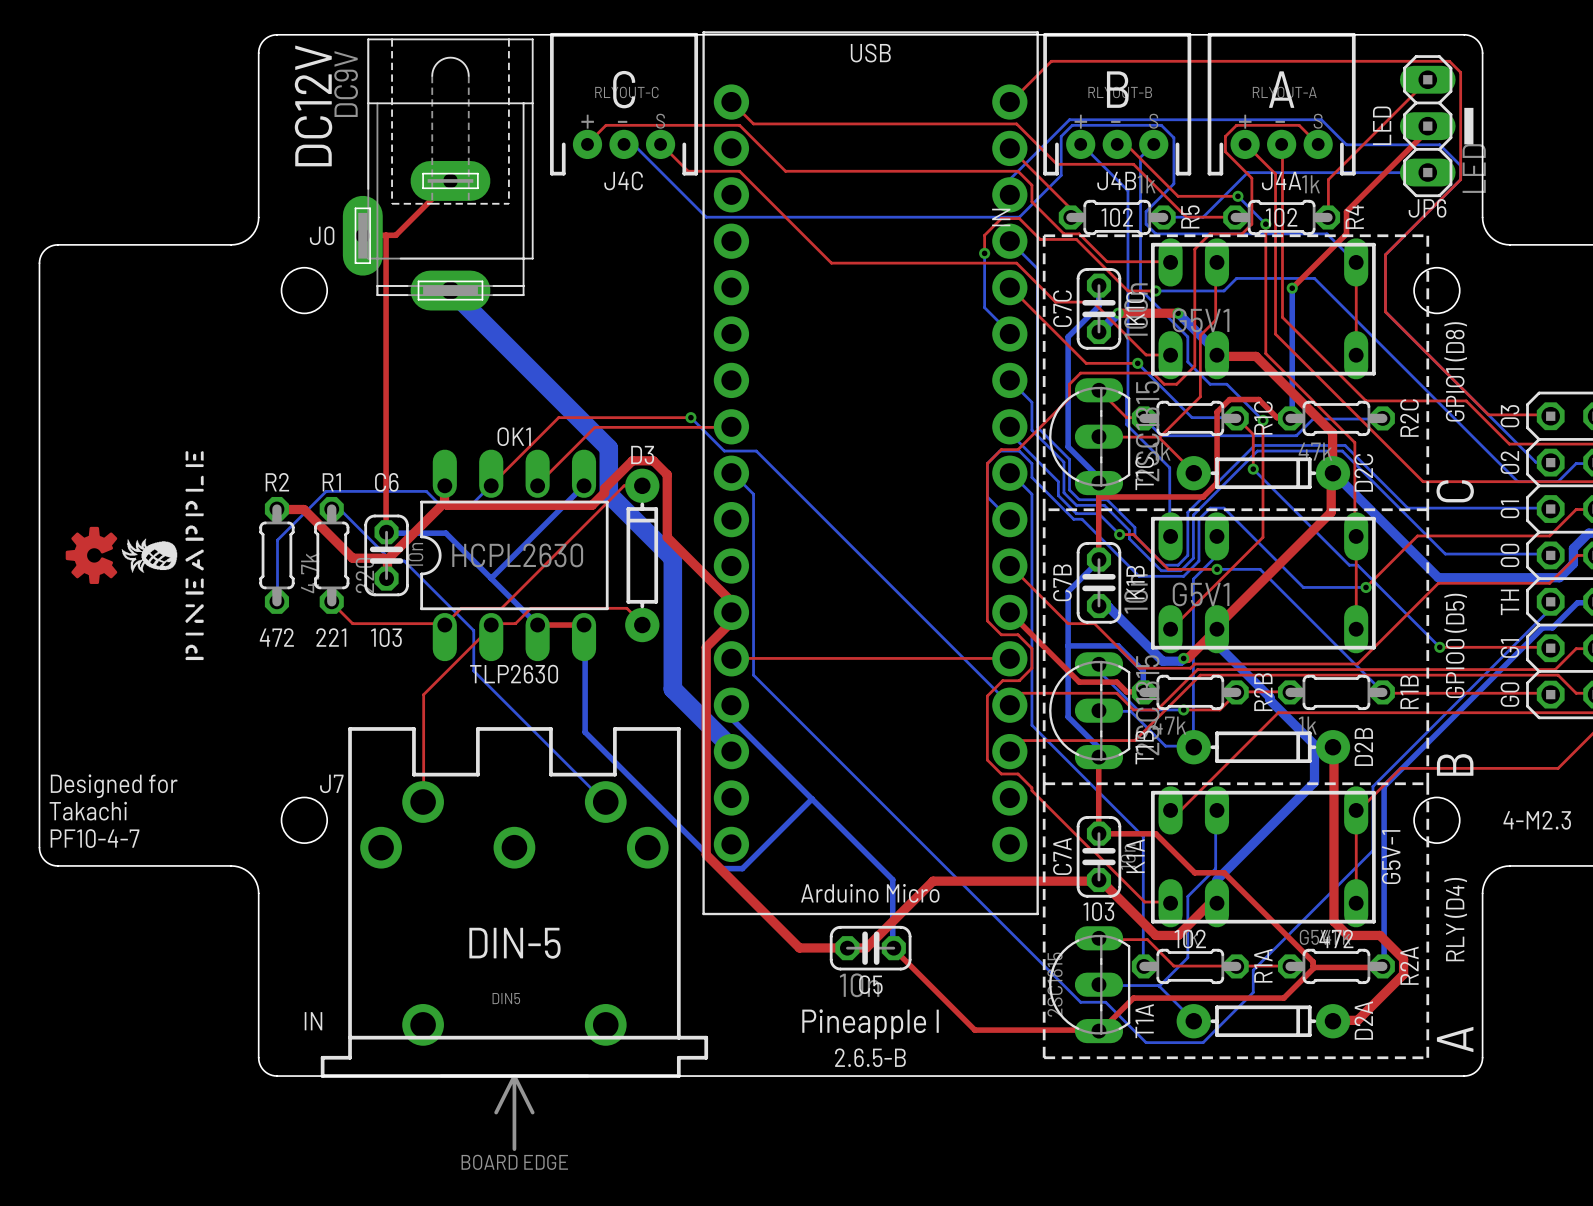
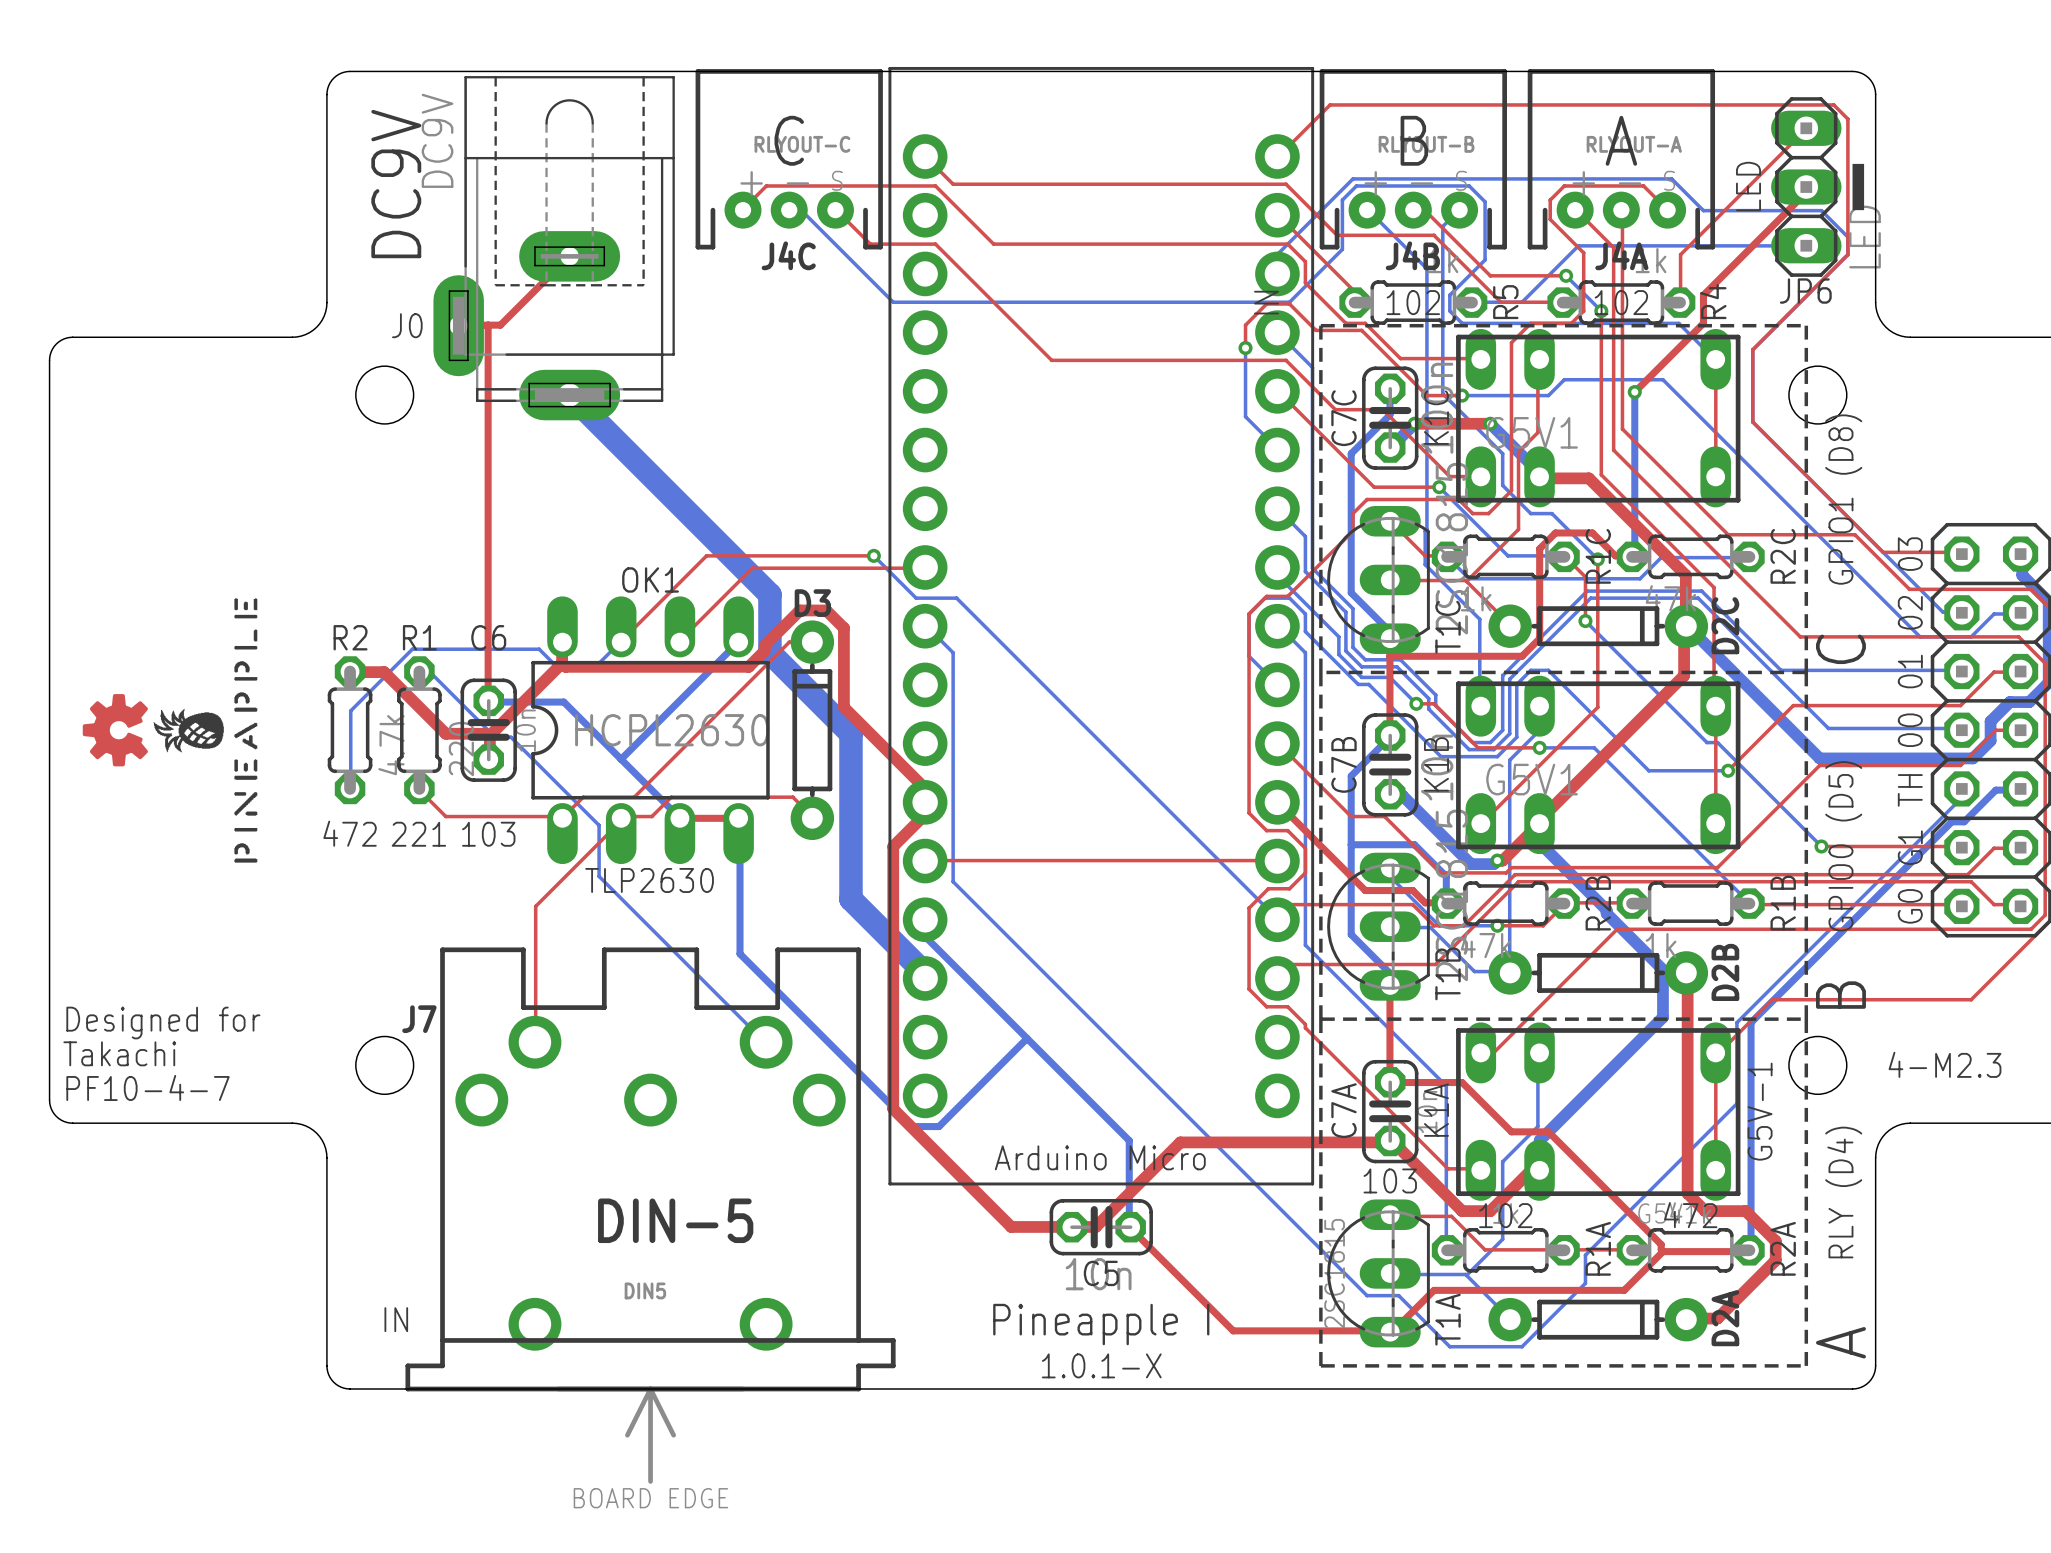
text: USB (870, 53) -> none
text: DC12V (313, 105) -> DC9V (396, 184)
text: 2.6.5-B (870, 1057) -> 1.0.1-X (1101, 1365)

